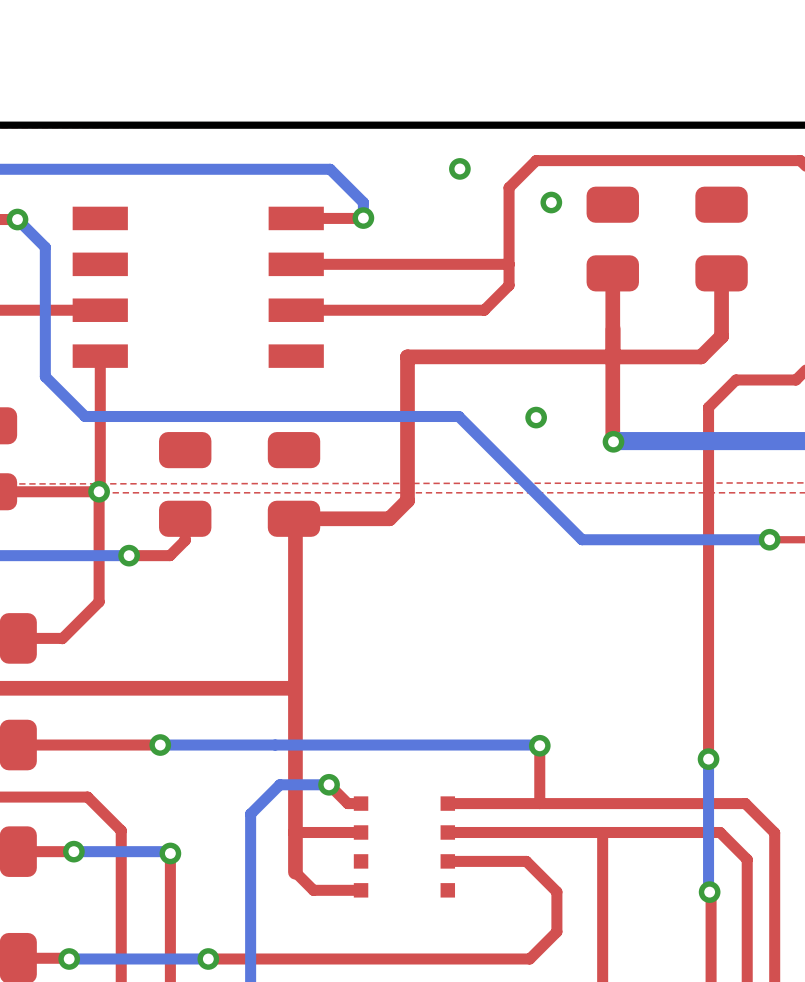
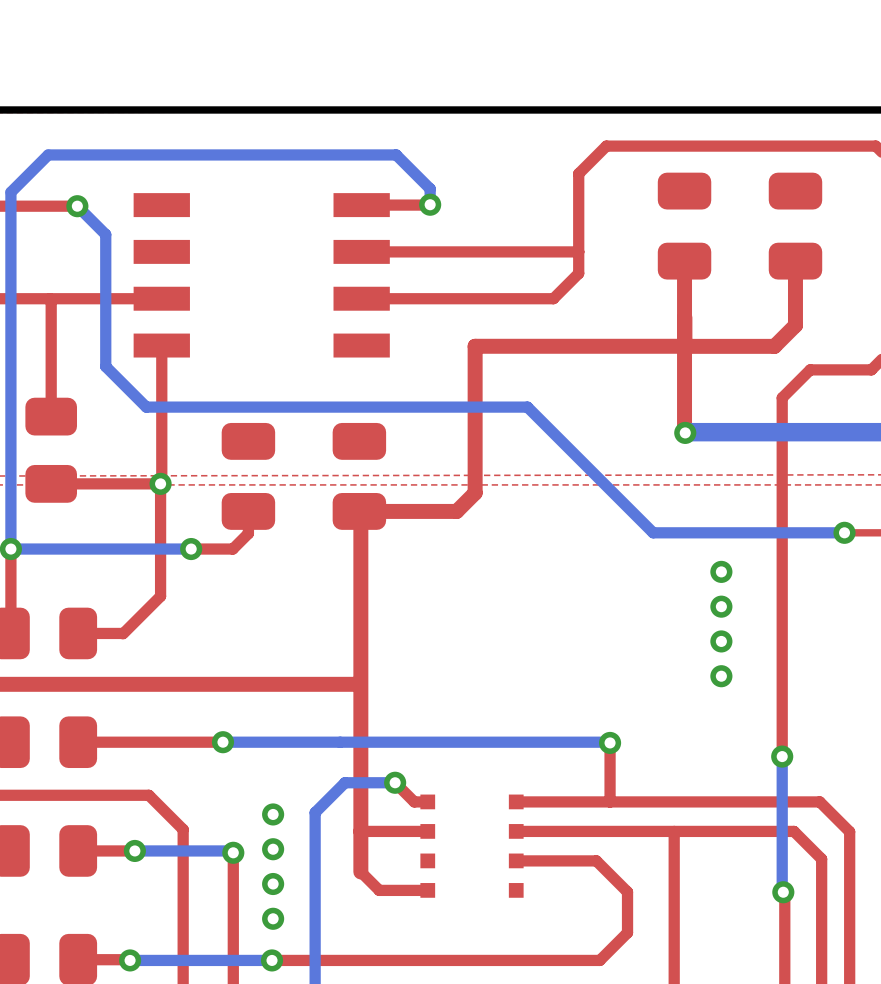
via: (459, 168) -> none
via: (551, 202) -> none
via: (536, 417) -> none
via: none -> (721, 571)
via: none -> (721, 606)
via: none -> (721, 641)
via: none -> (721, 676)
via: none -> (273, 814)
via: none -> (273, 849)
via: none -> (273, 884)
via: none -> (273, 918)

